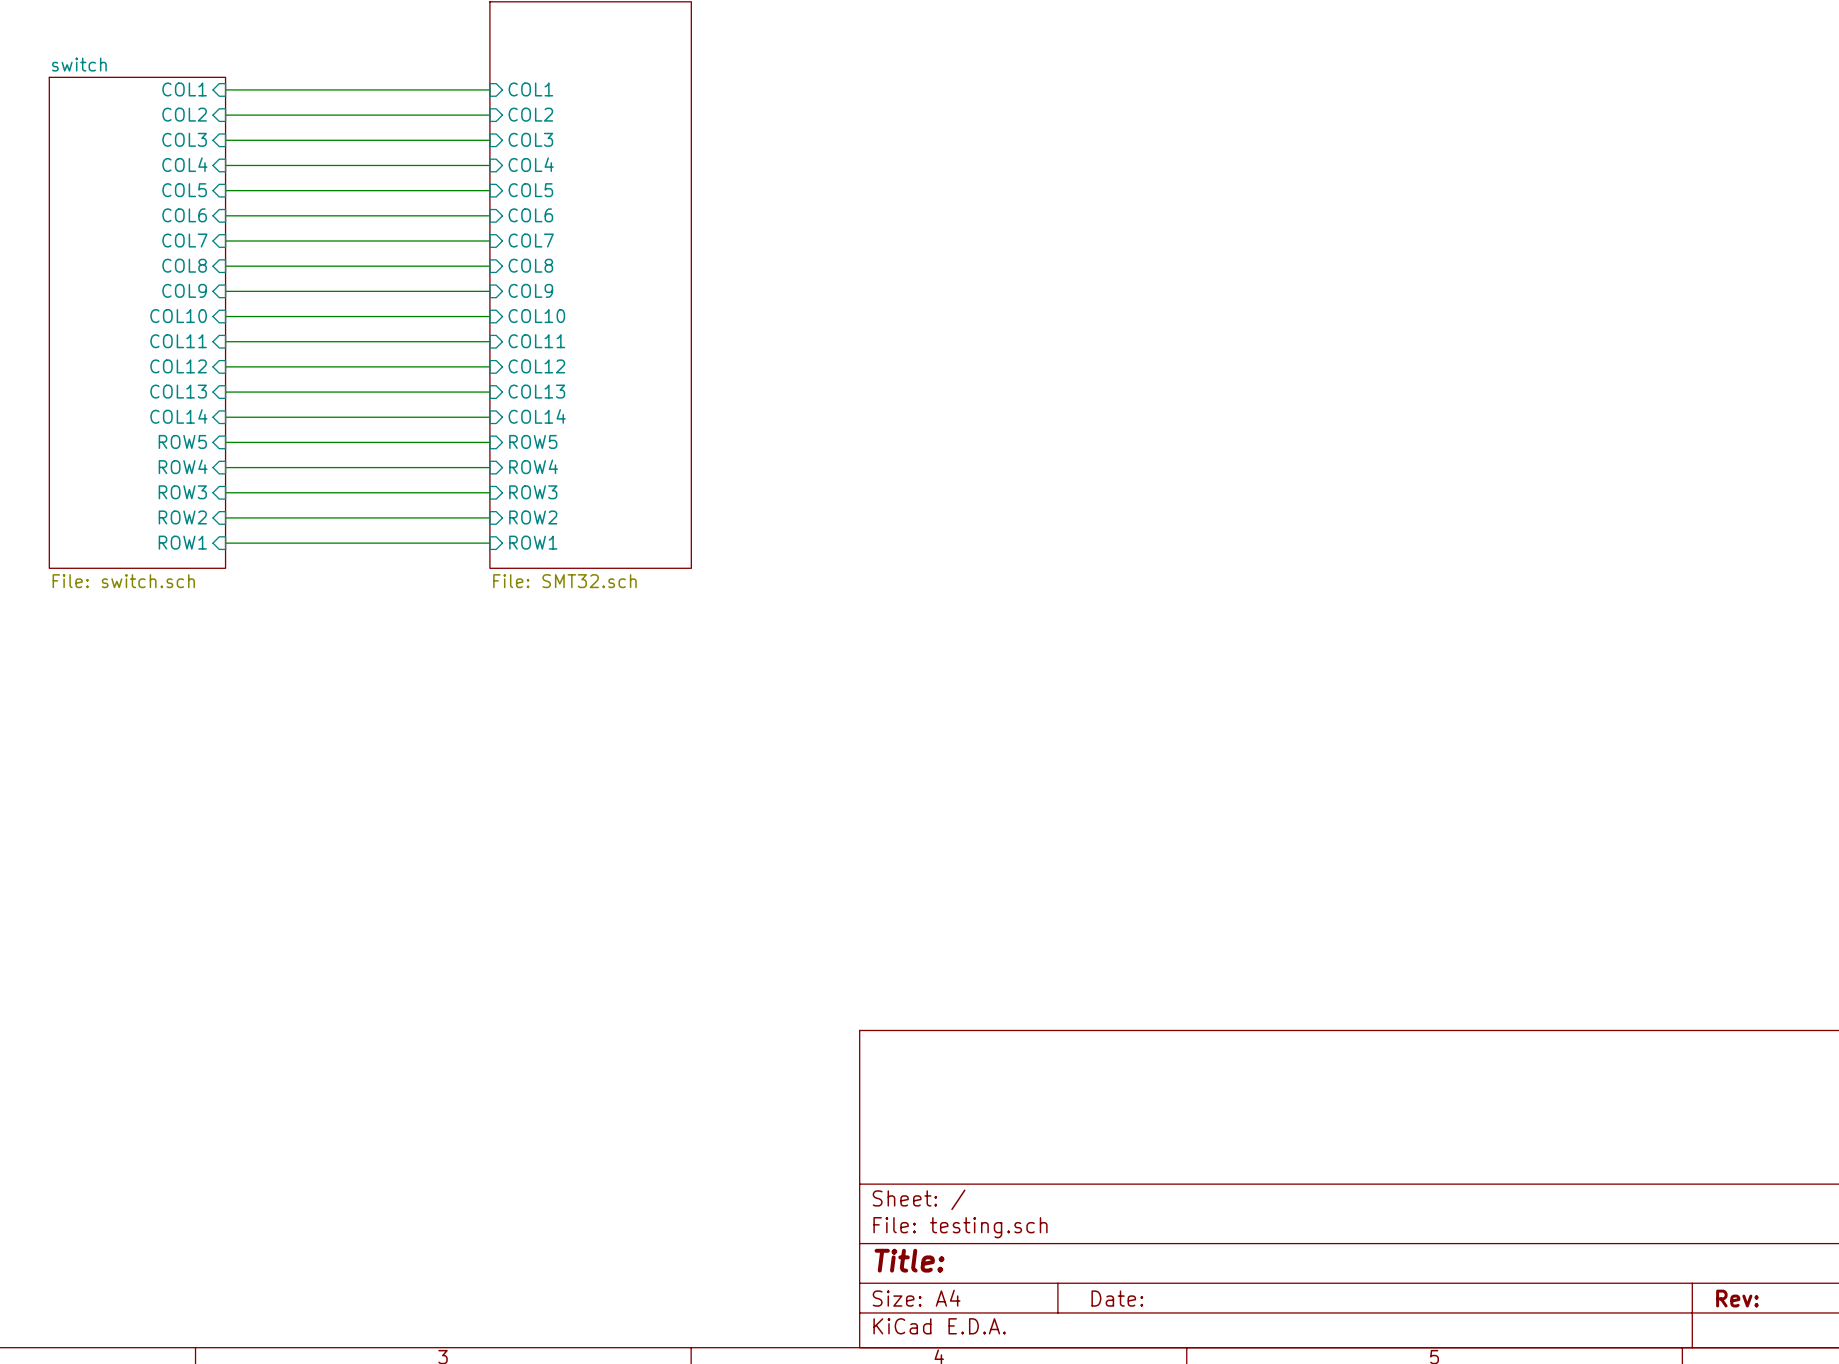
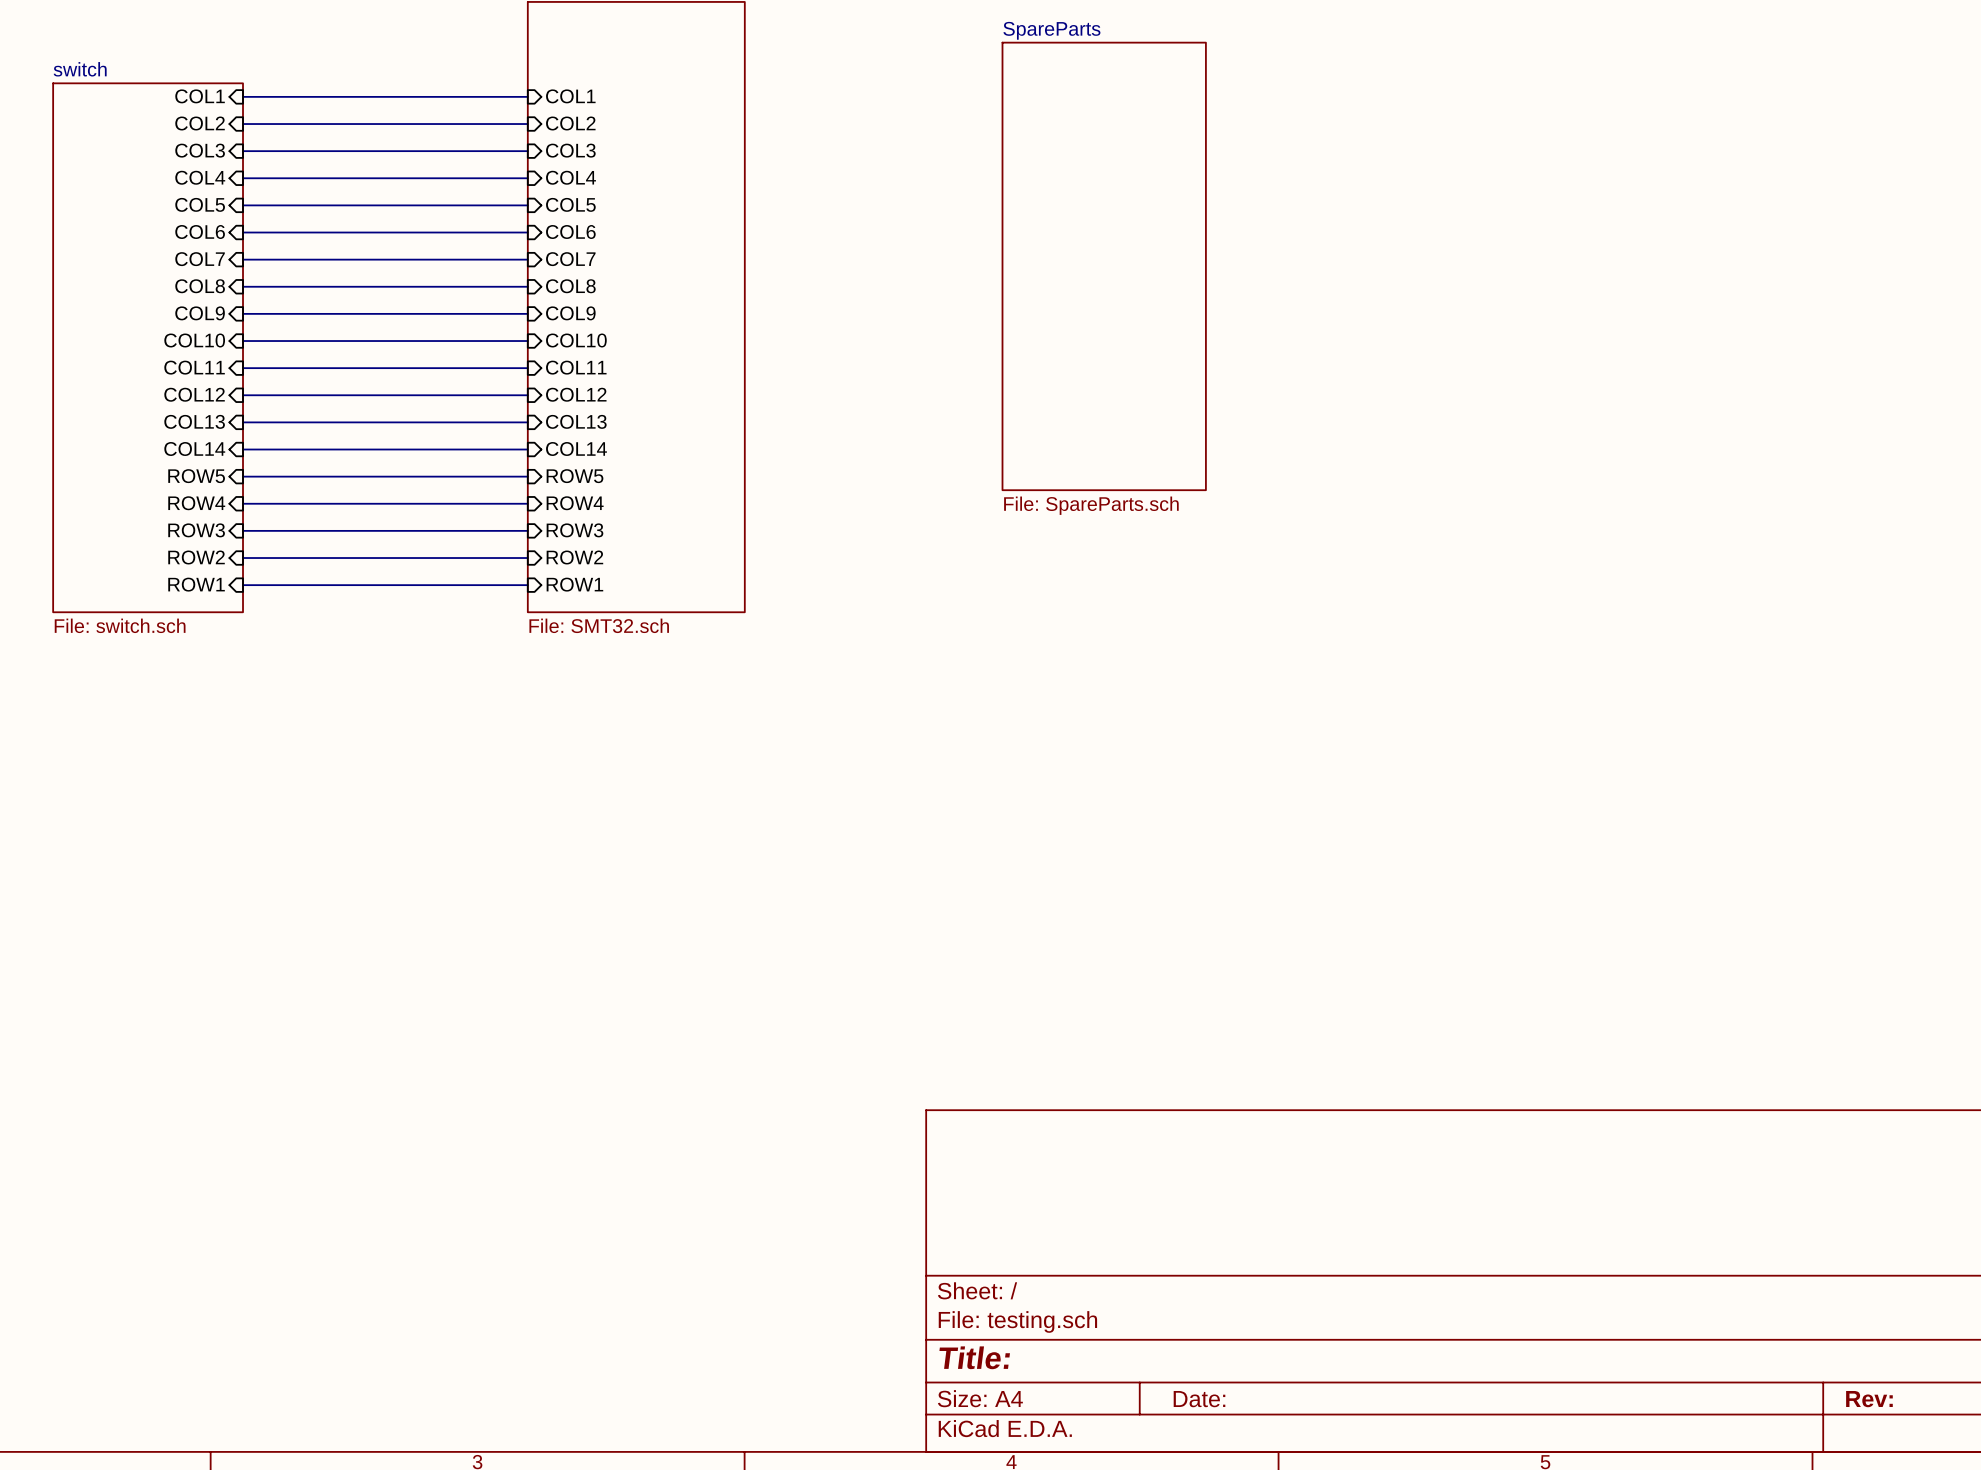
sheet SpareParts: none -> File: SpareParts.sch (1104, 266)

